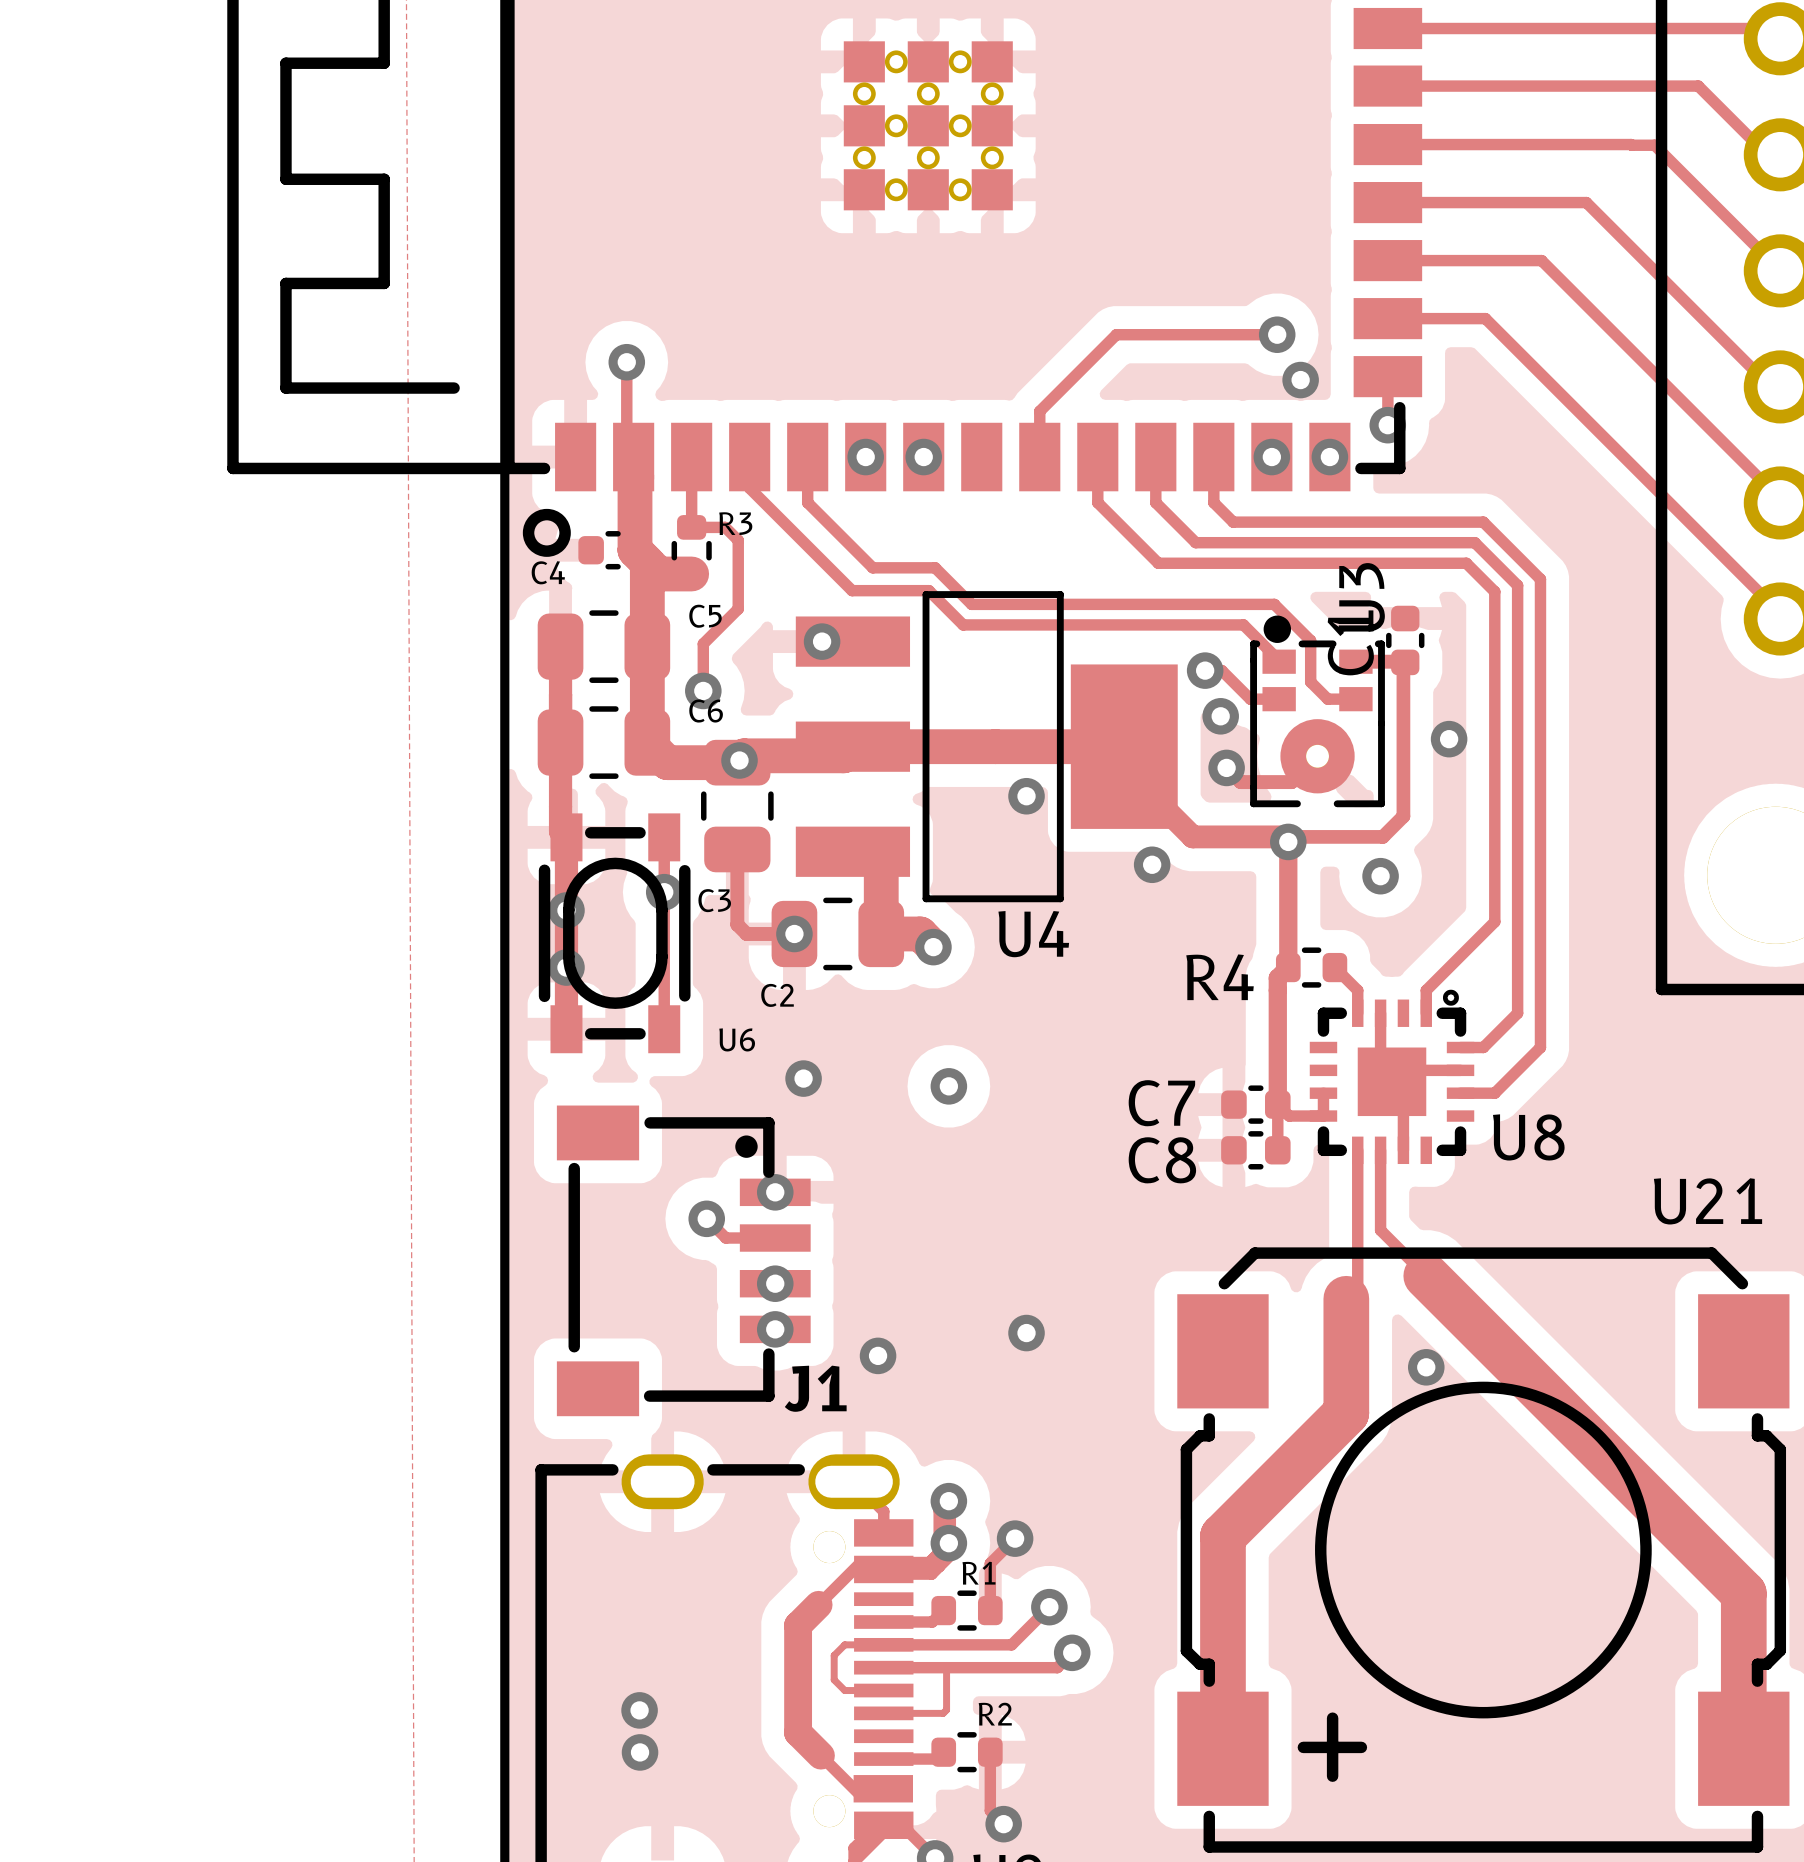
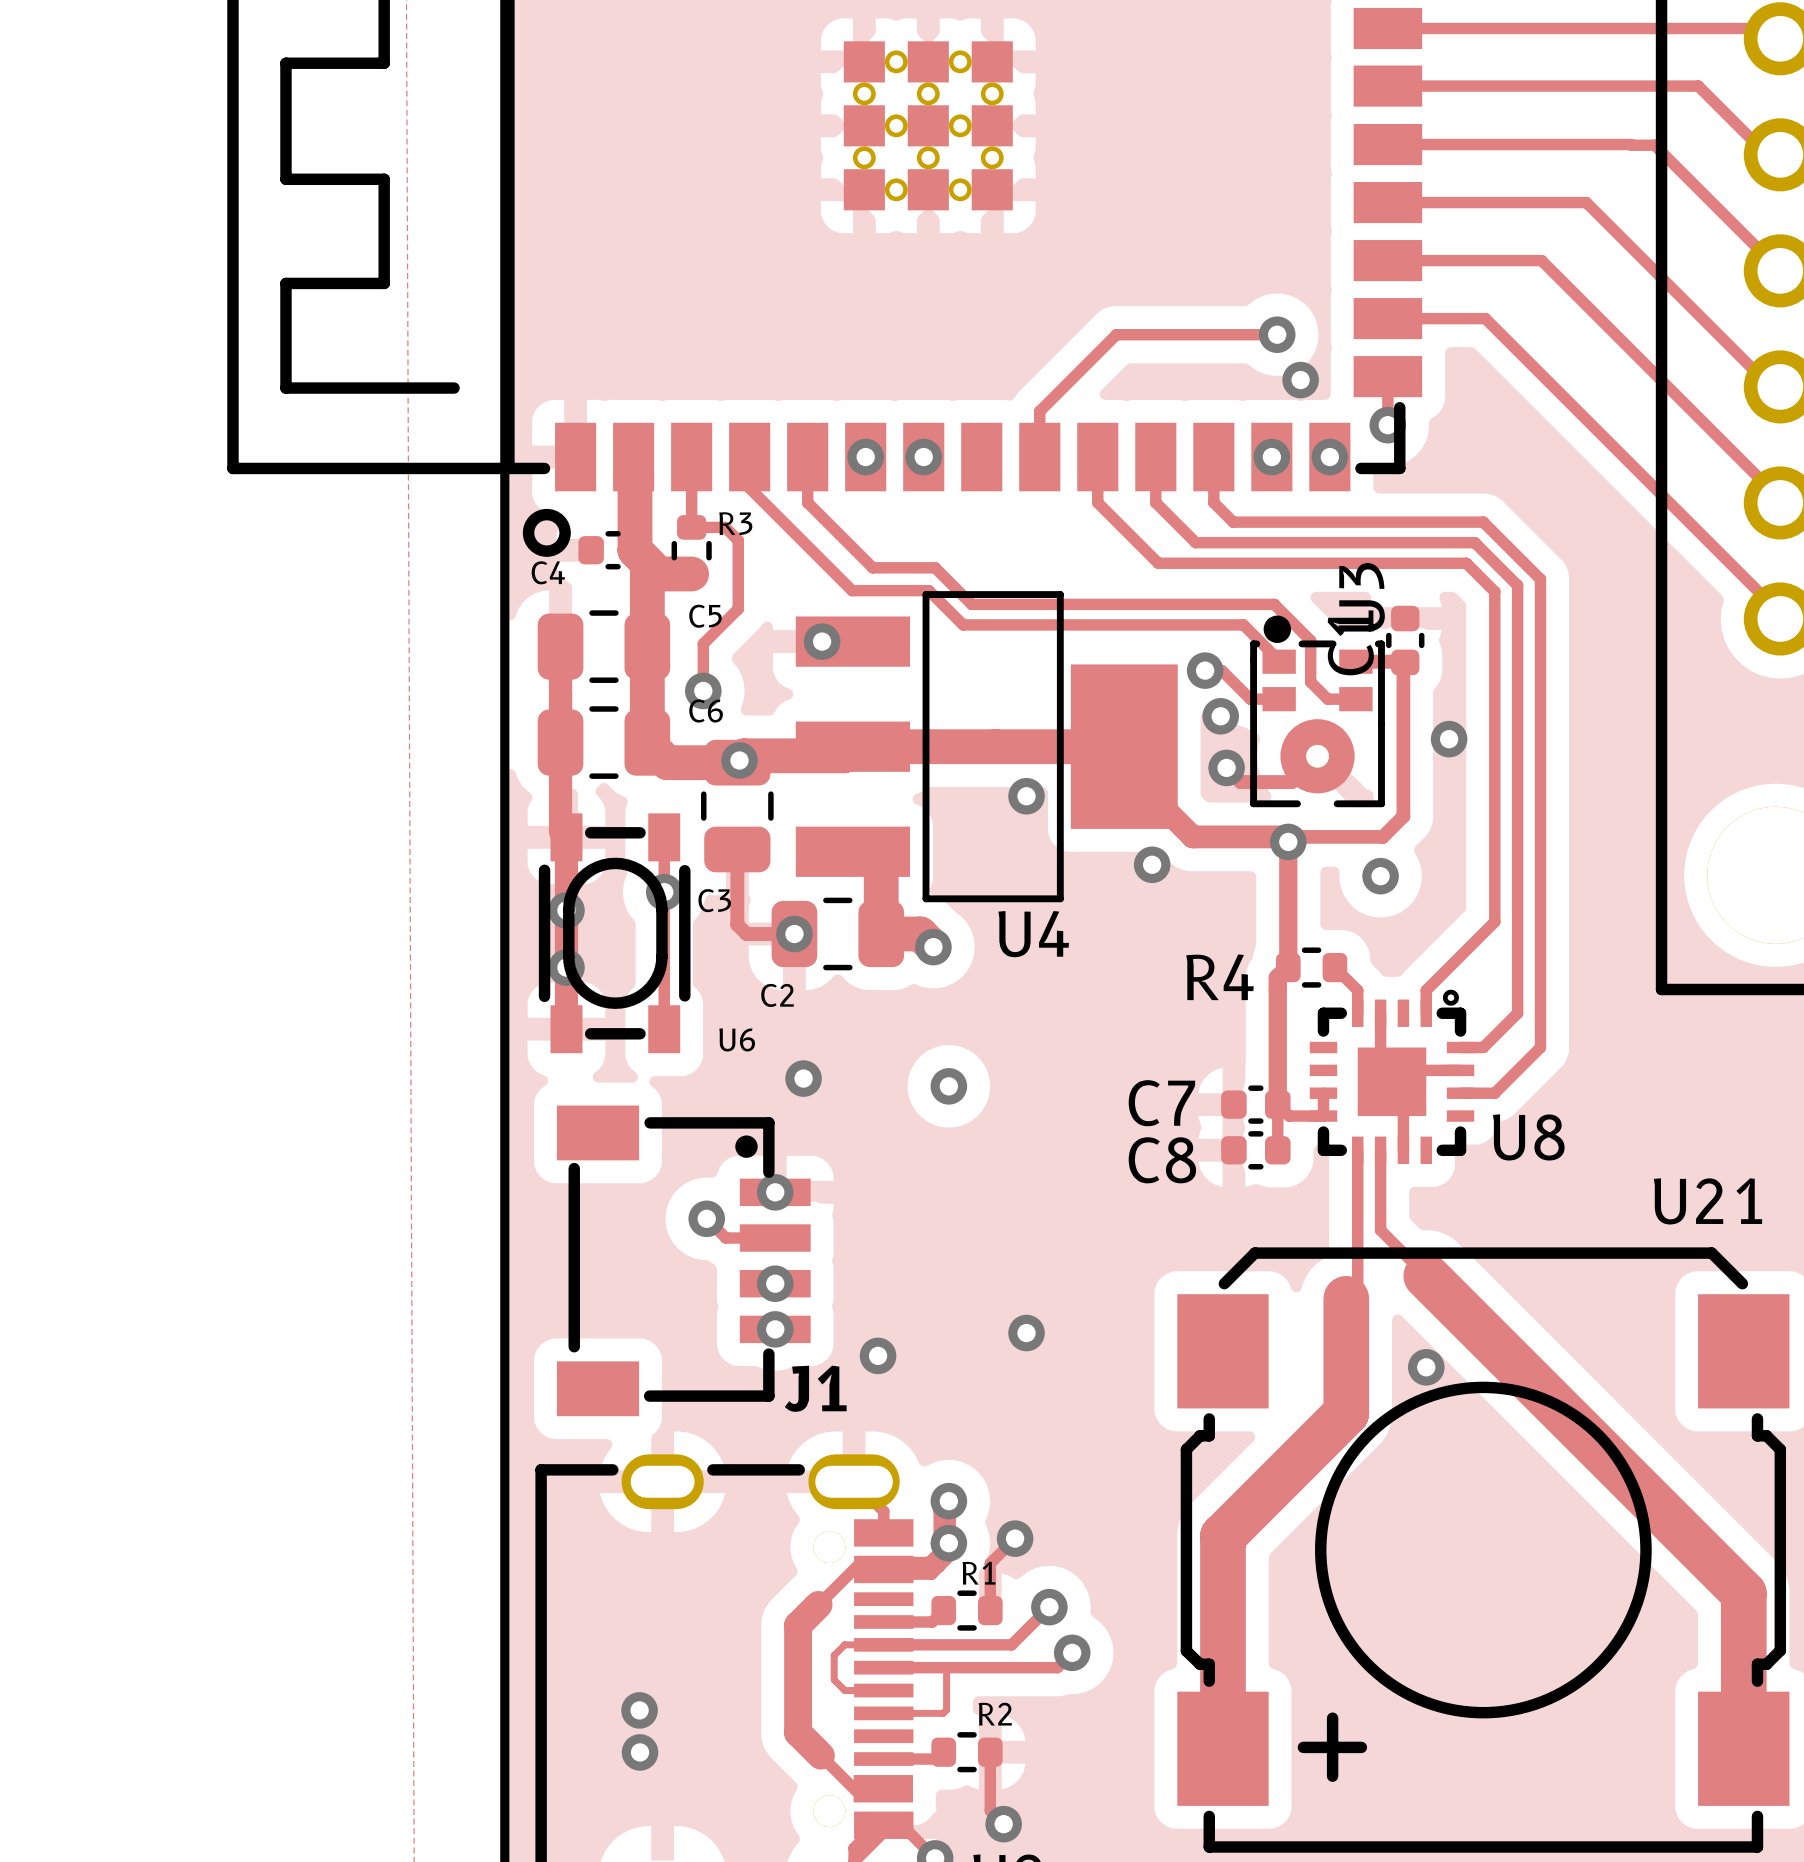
track: (626, 362) (626, 450) (633, 457) -> none
via: (626, 362) -> none

